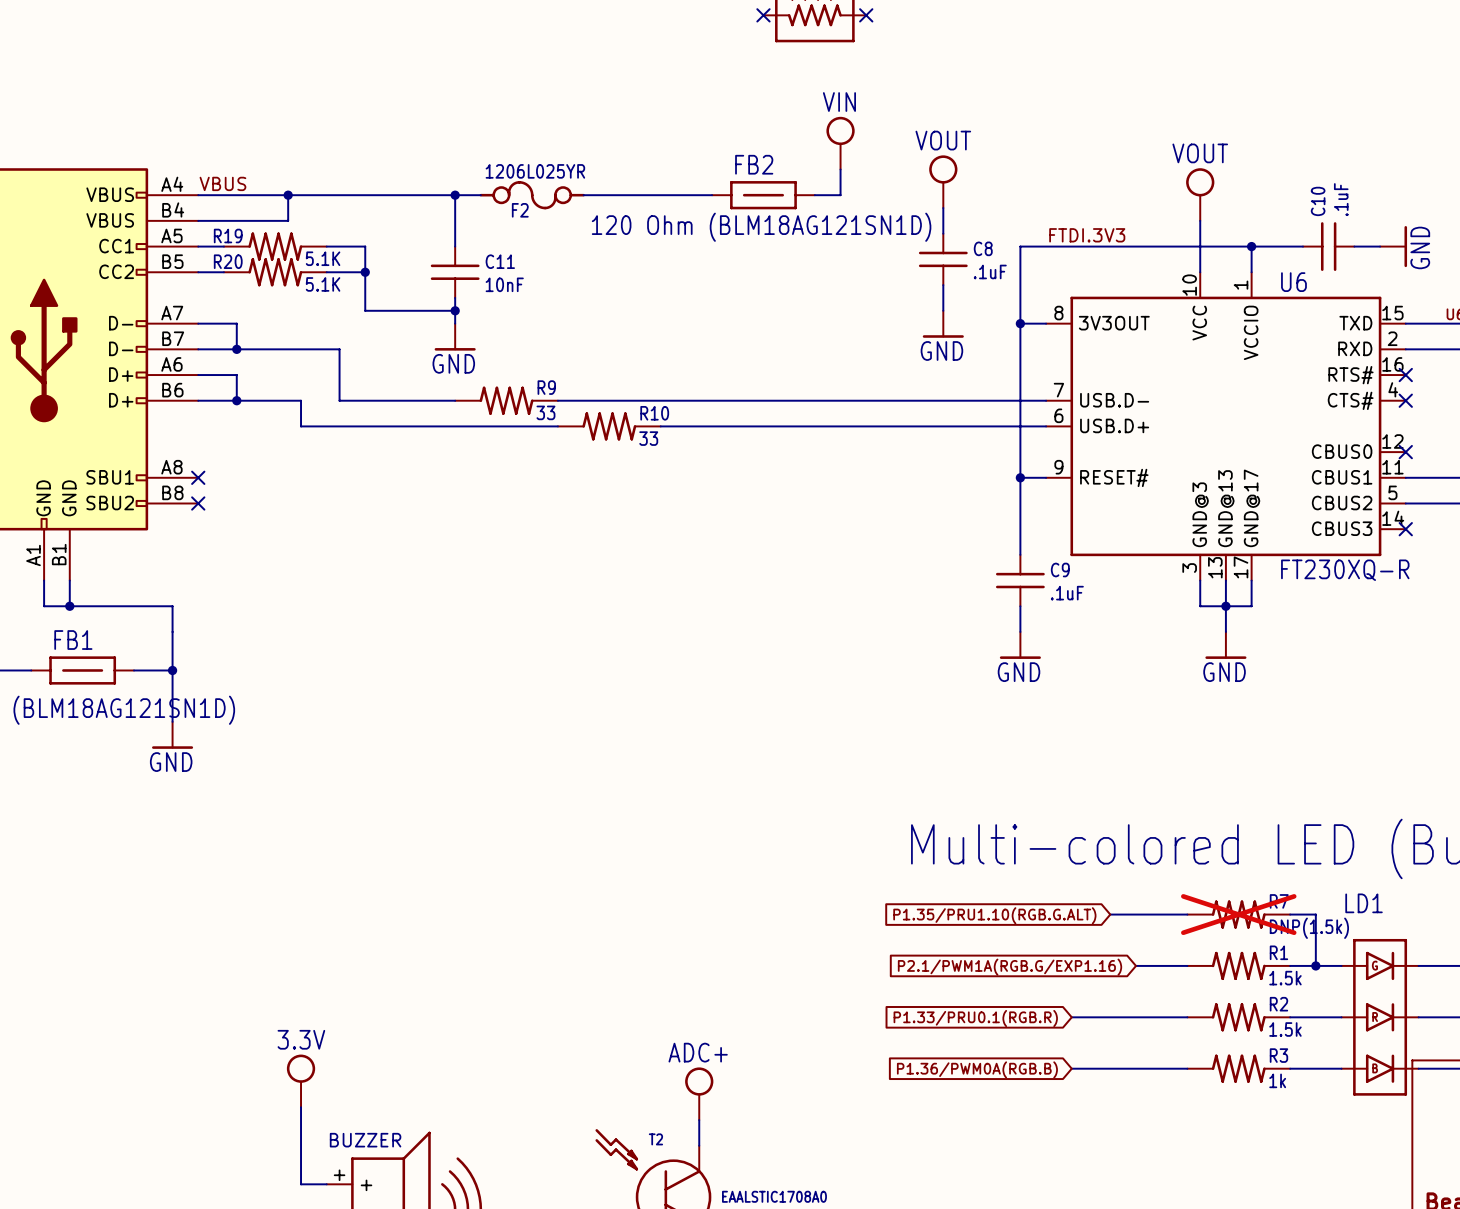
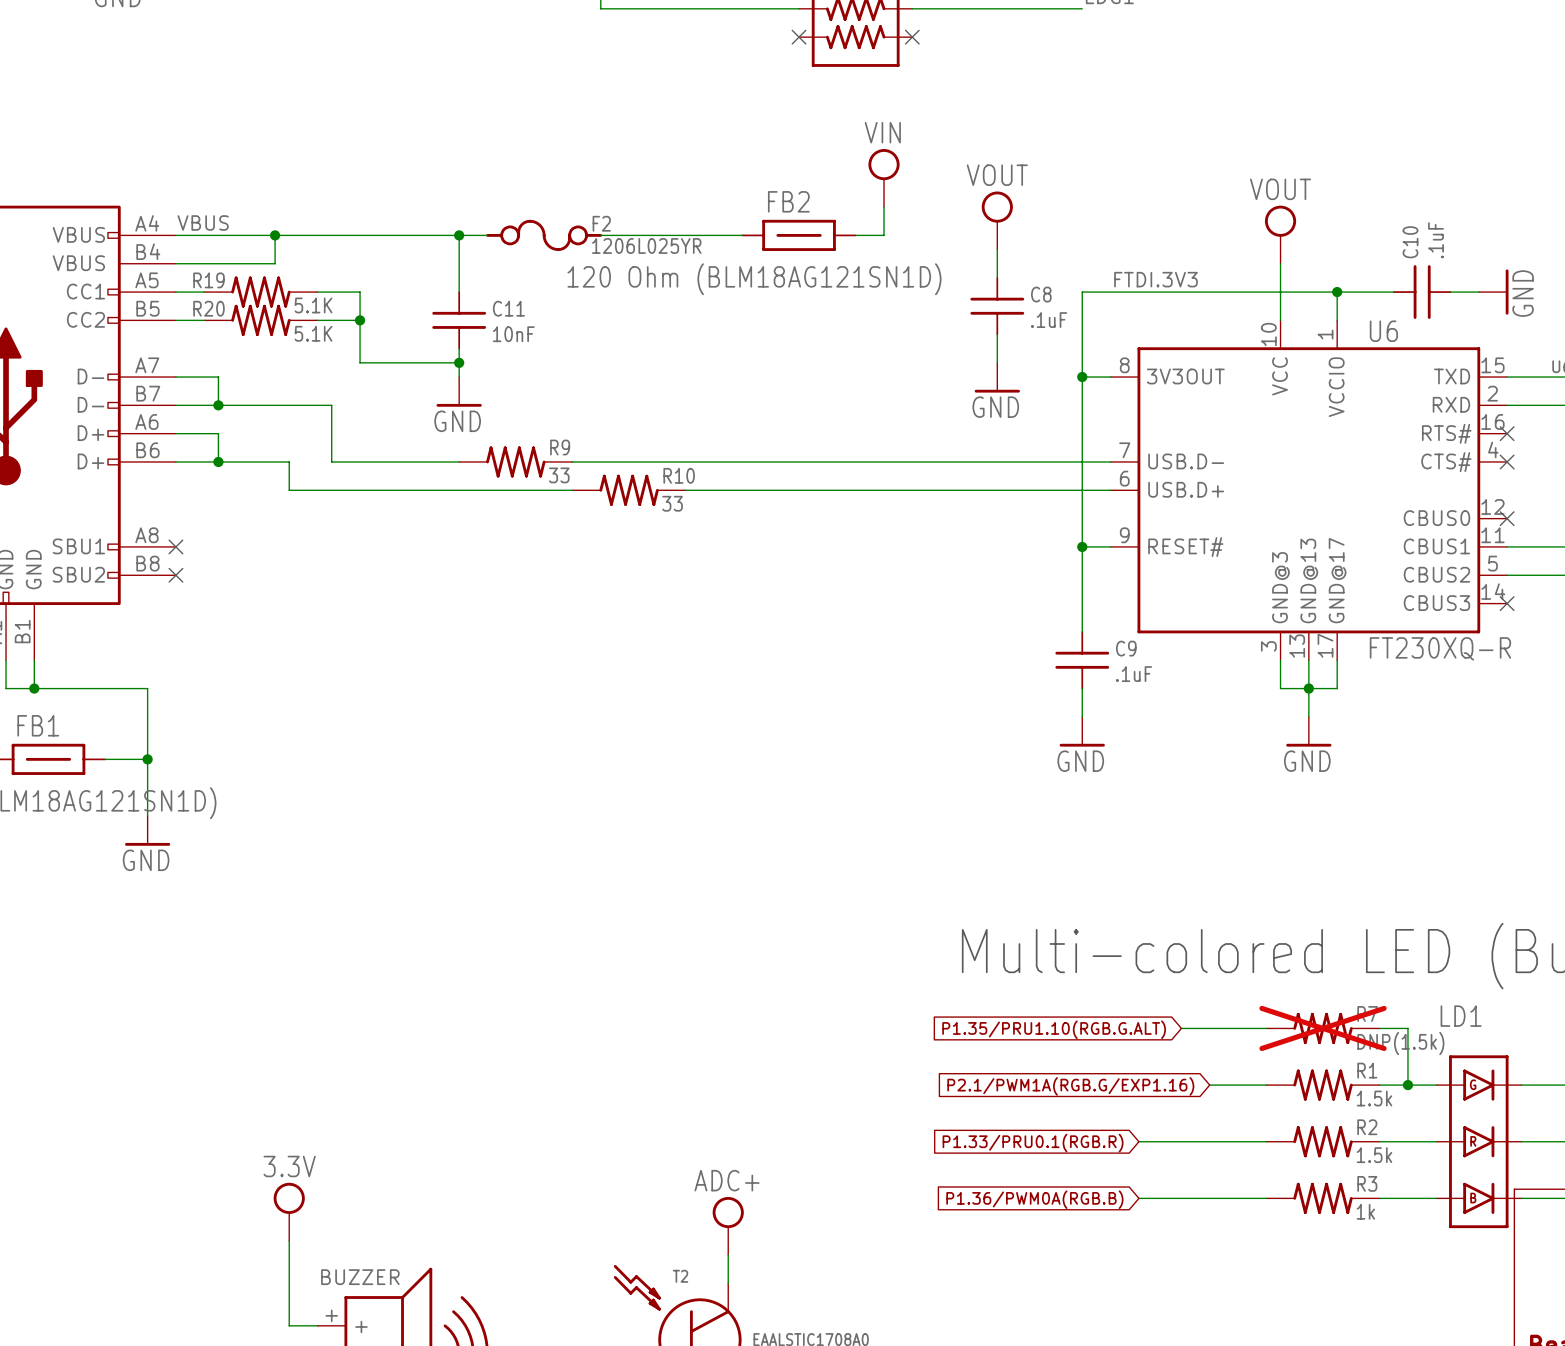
F2 value position: 1206L025YR (535, 171) -> 1206L025YR (646, 245)
F2 name position: F2 (520, 210) -> F2 (601, 223)
FB2 value position: 120 Ohm (BLM18AG121SN1D) (761, 227) -> 120 Ohm (BLM18AG121SN1D) (754, 279)

